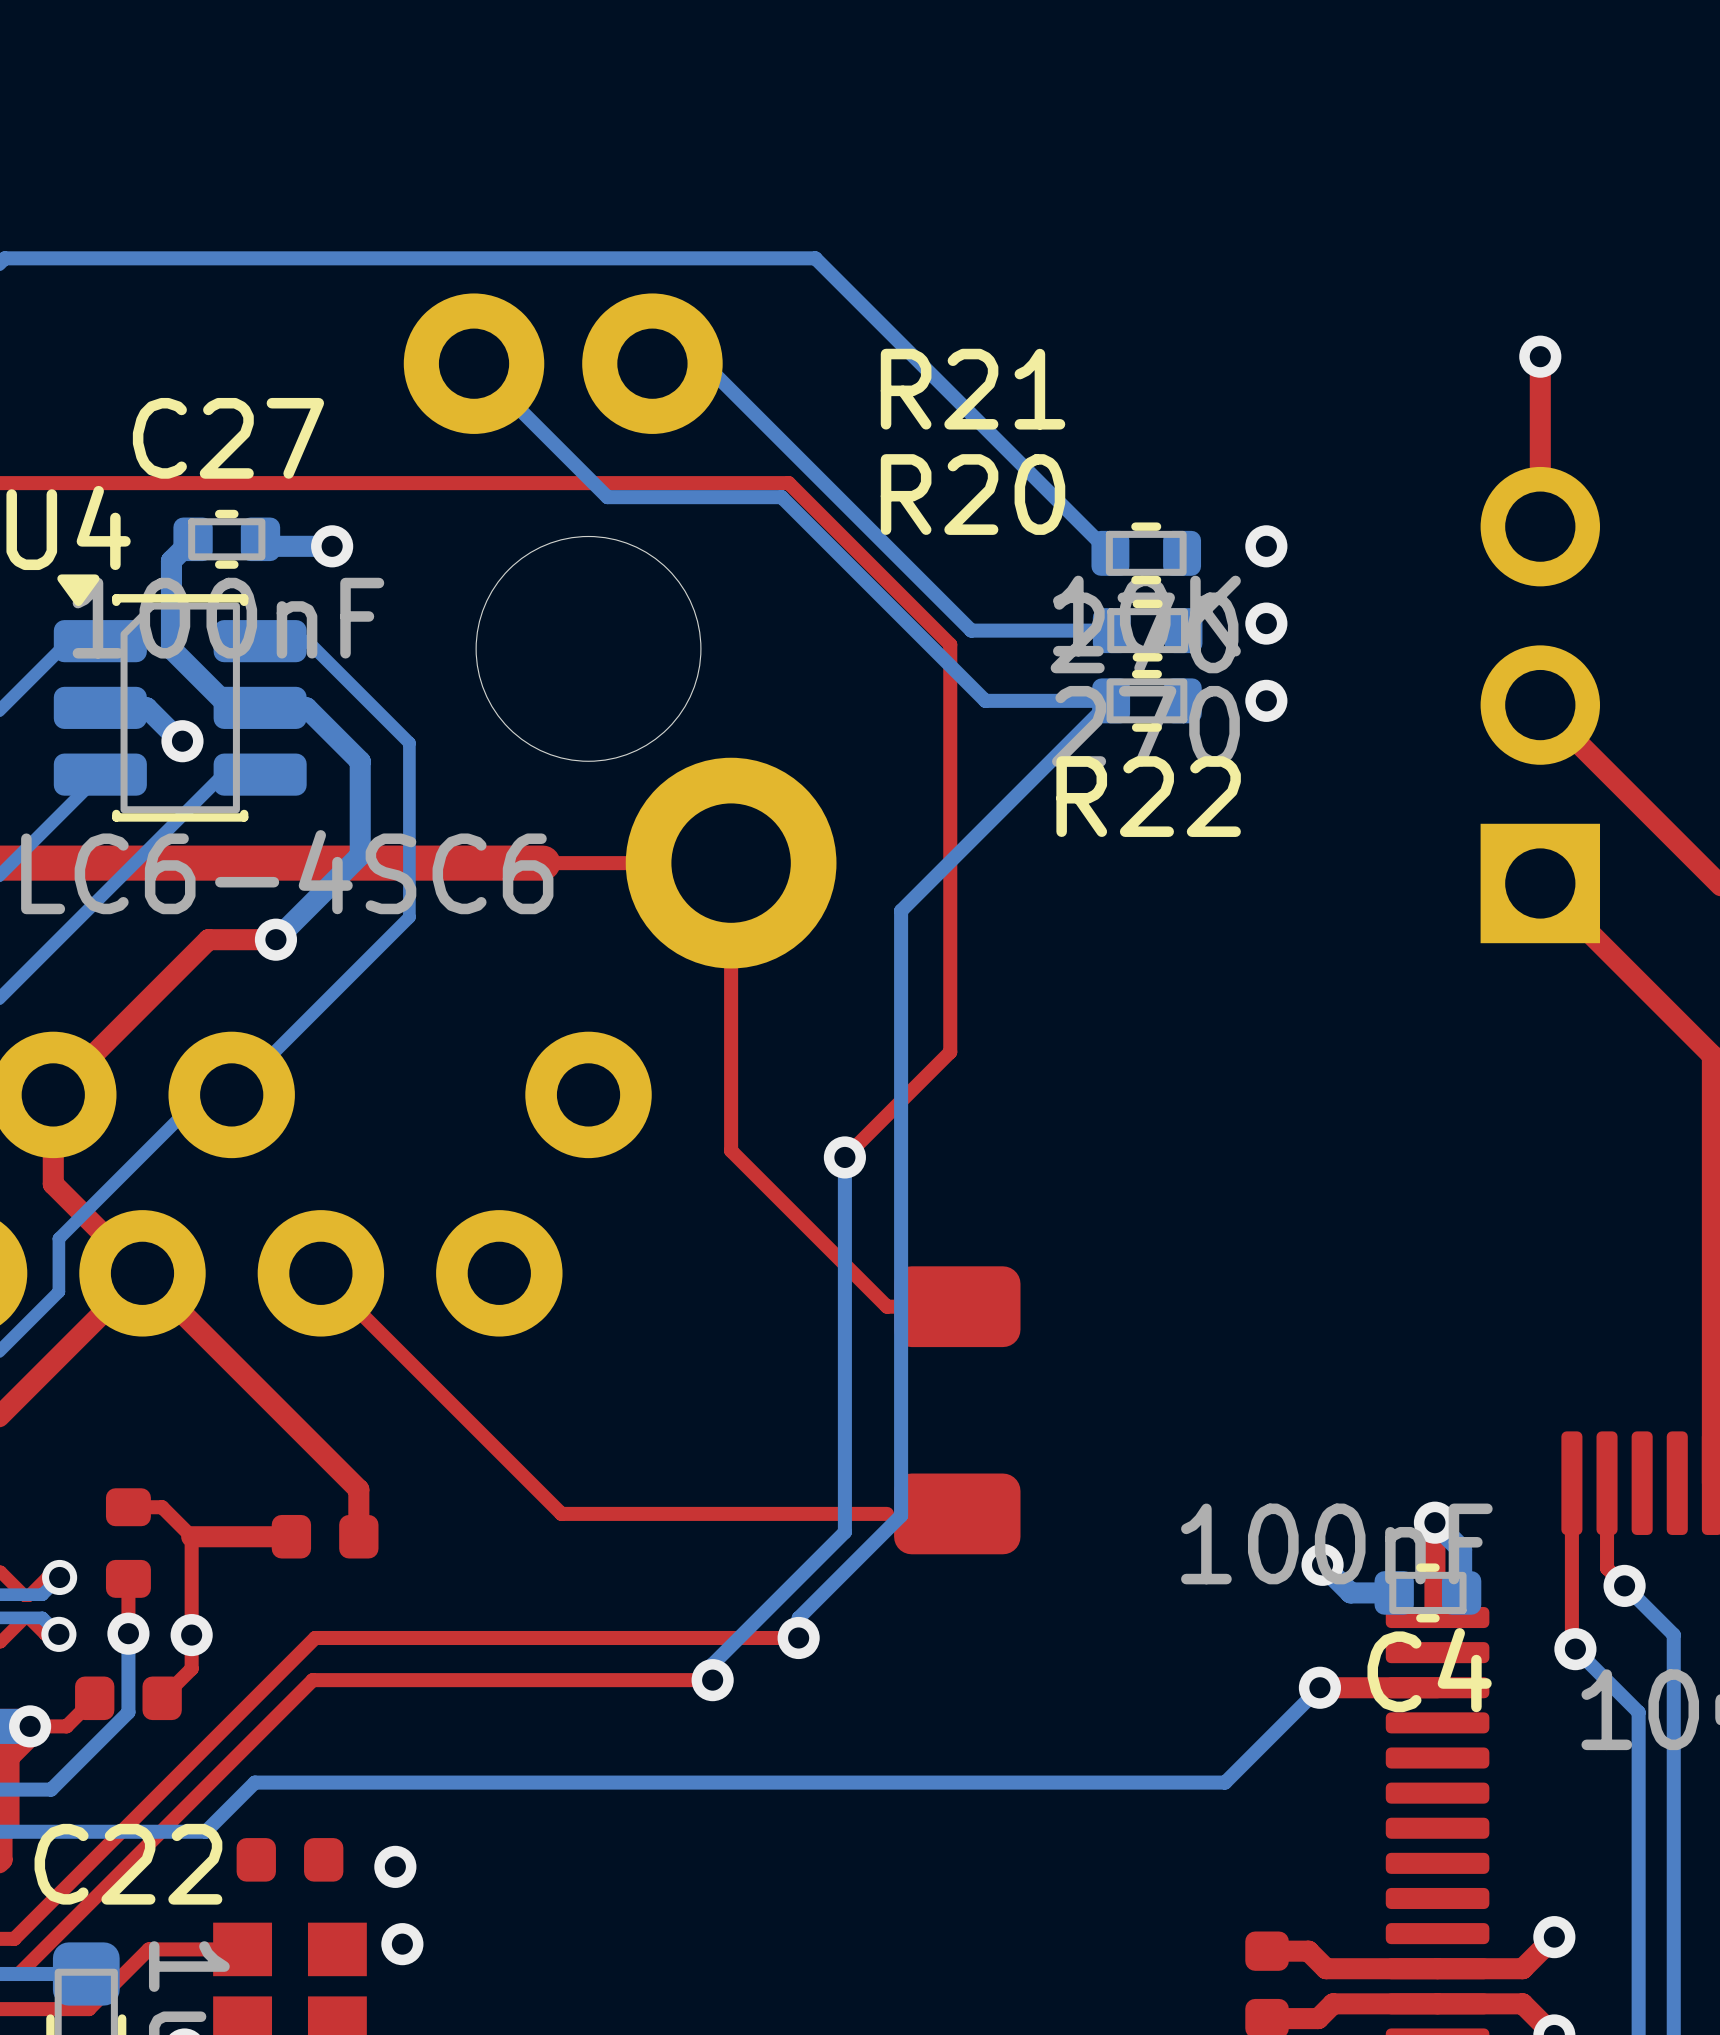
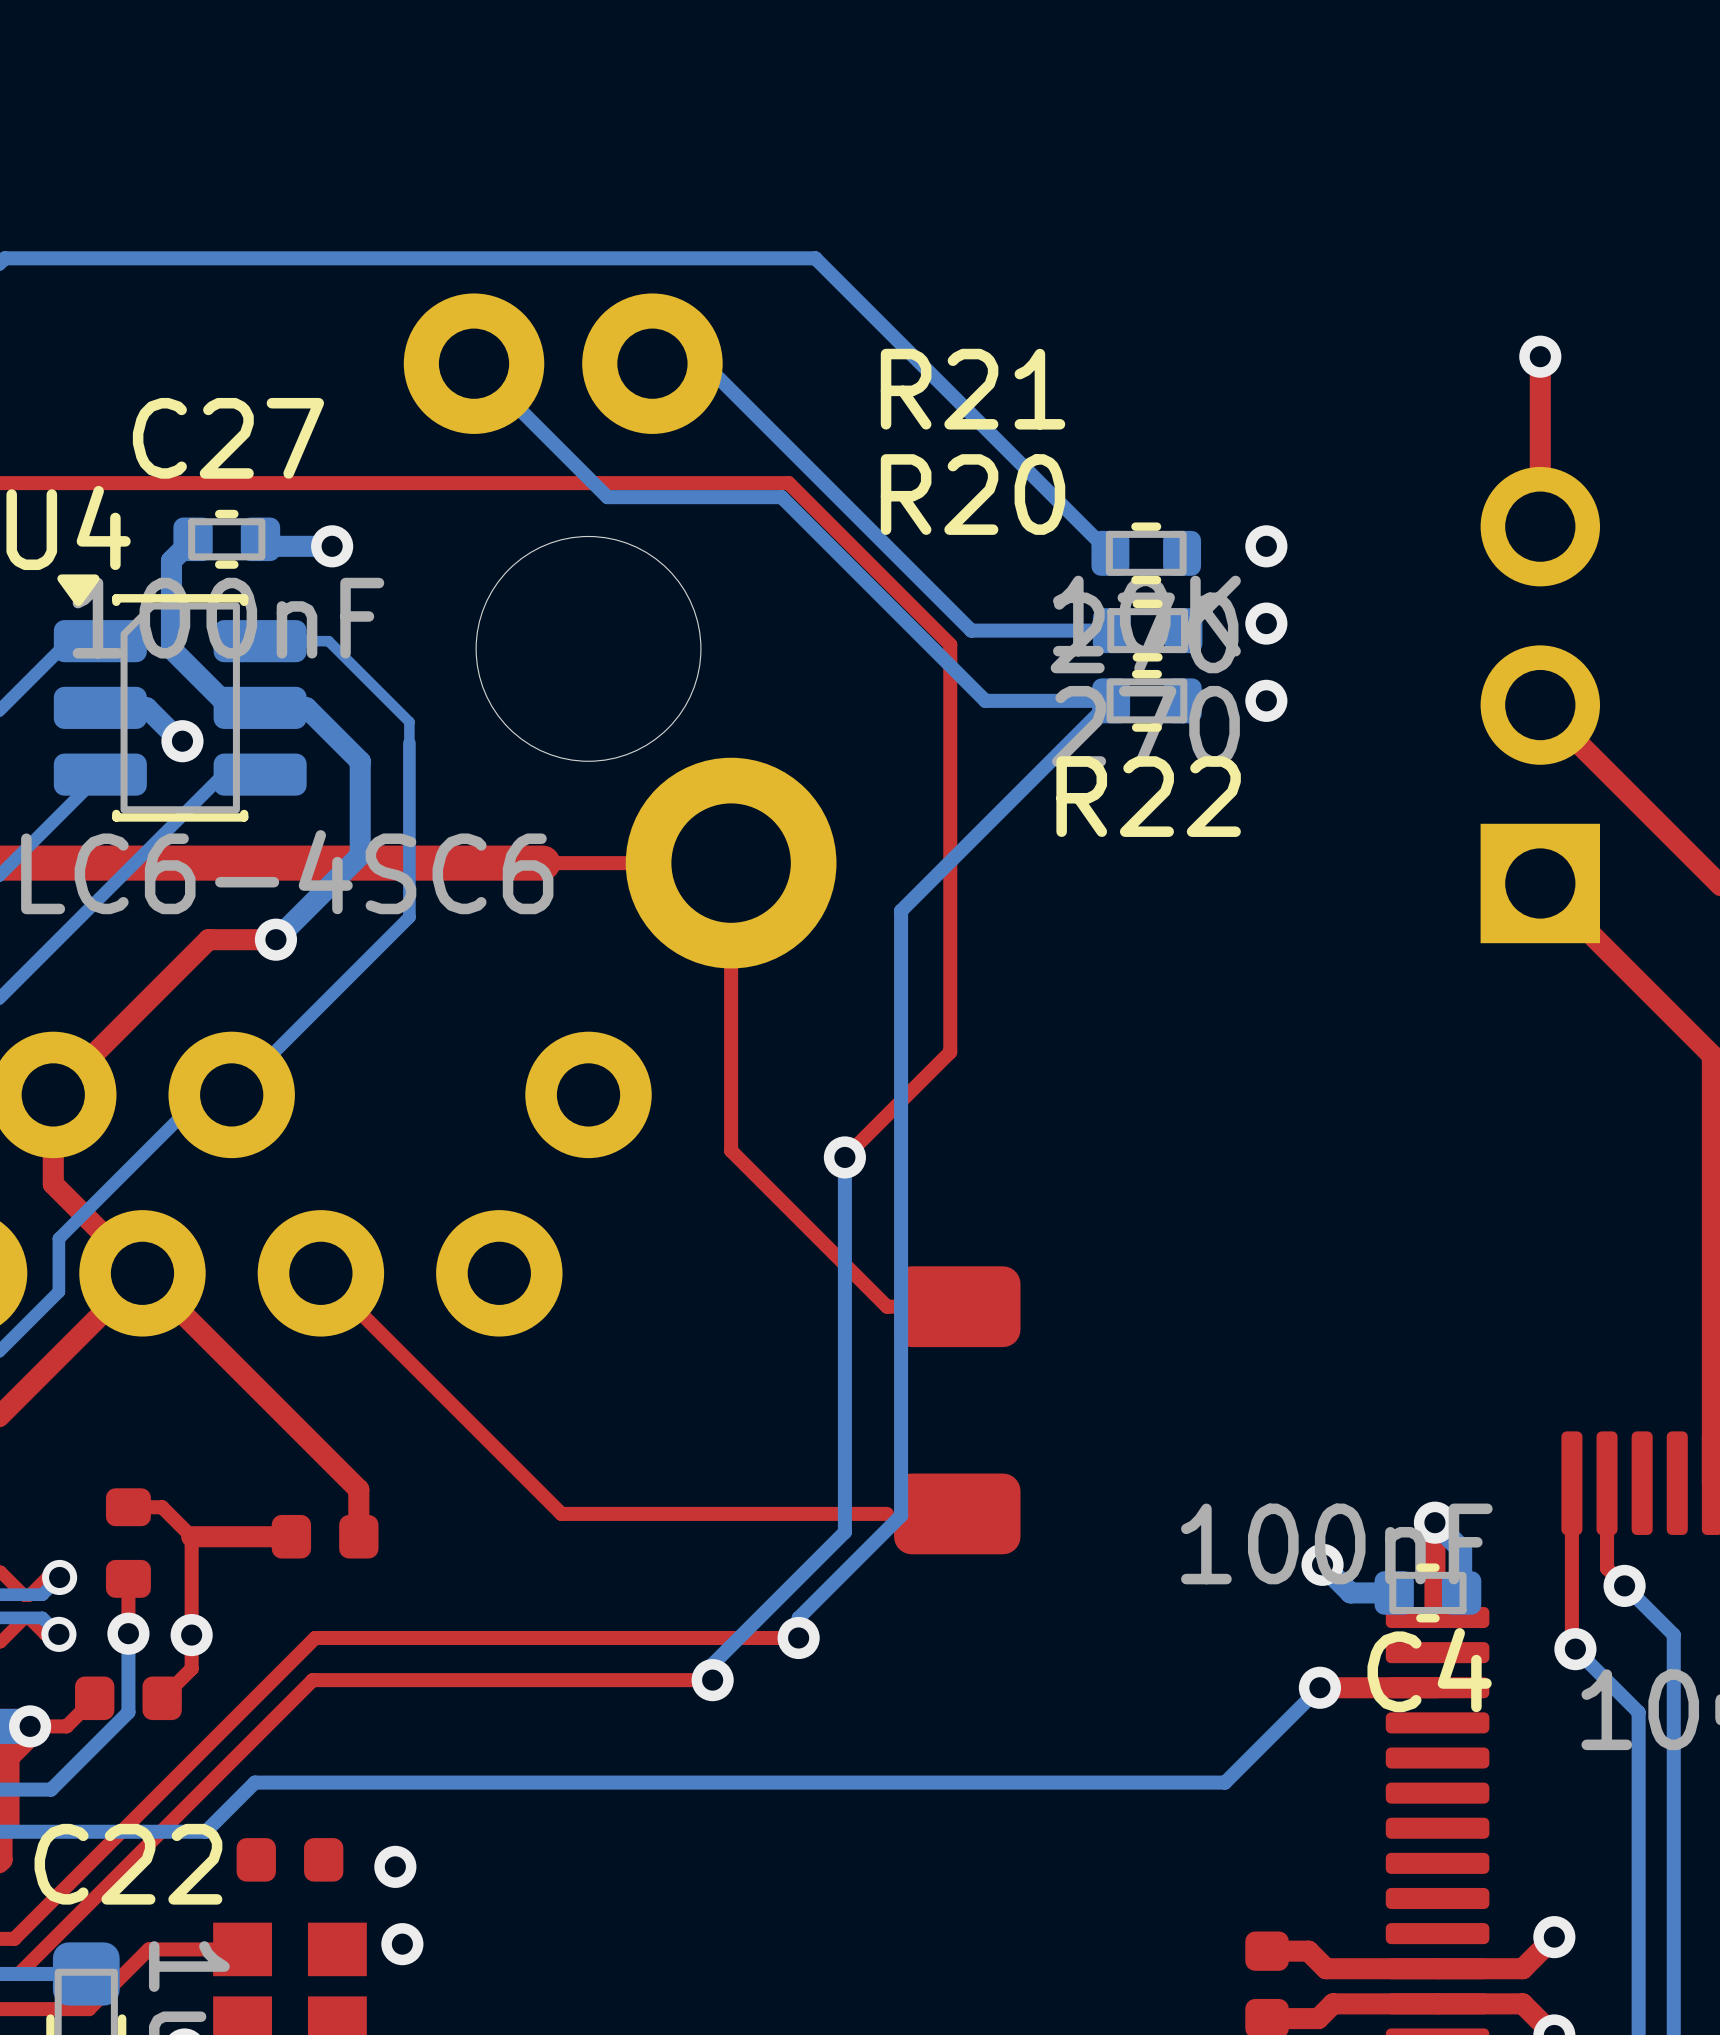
bottom track: (307, 641) (409, 743) -> (307, 641) (328, 641) (409, 721) (409, 743)

